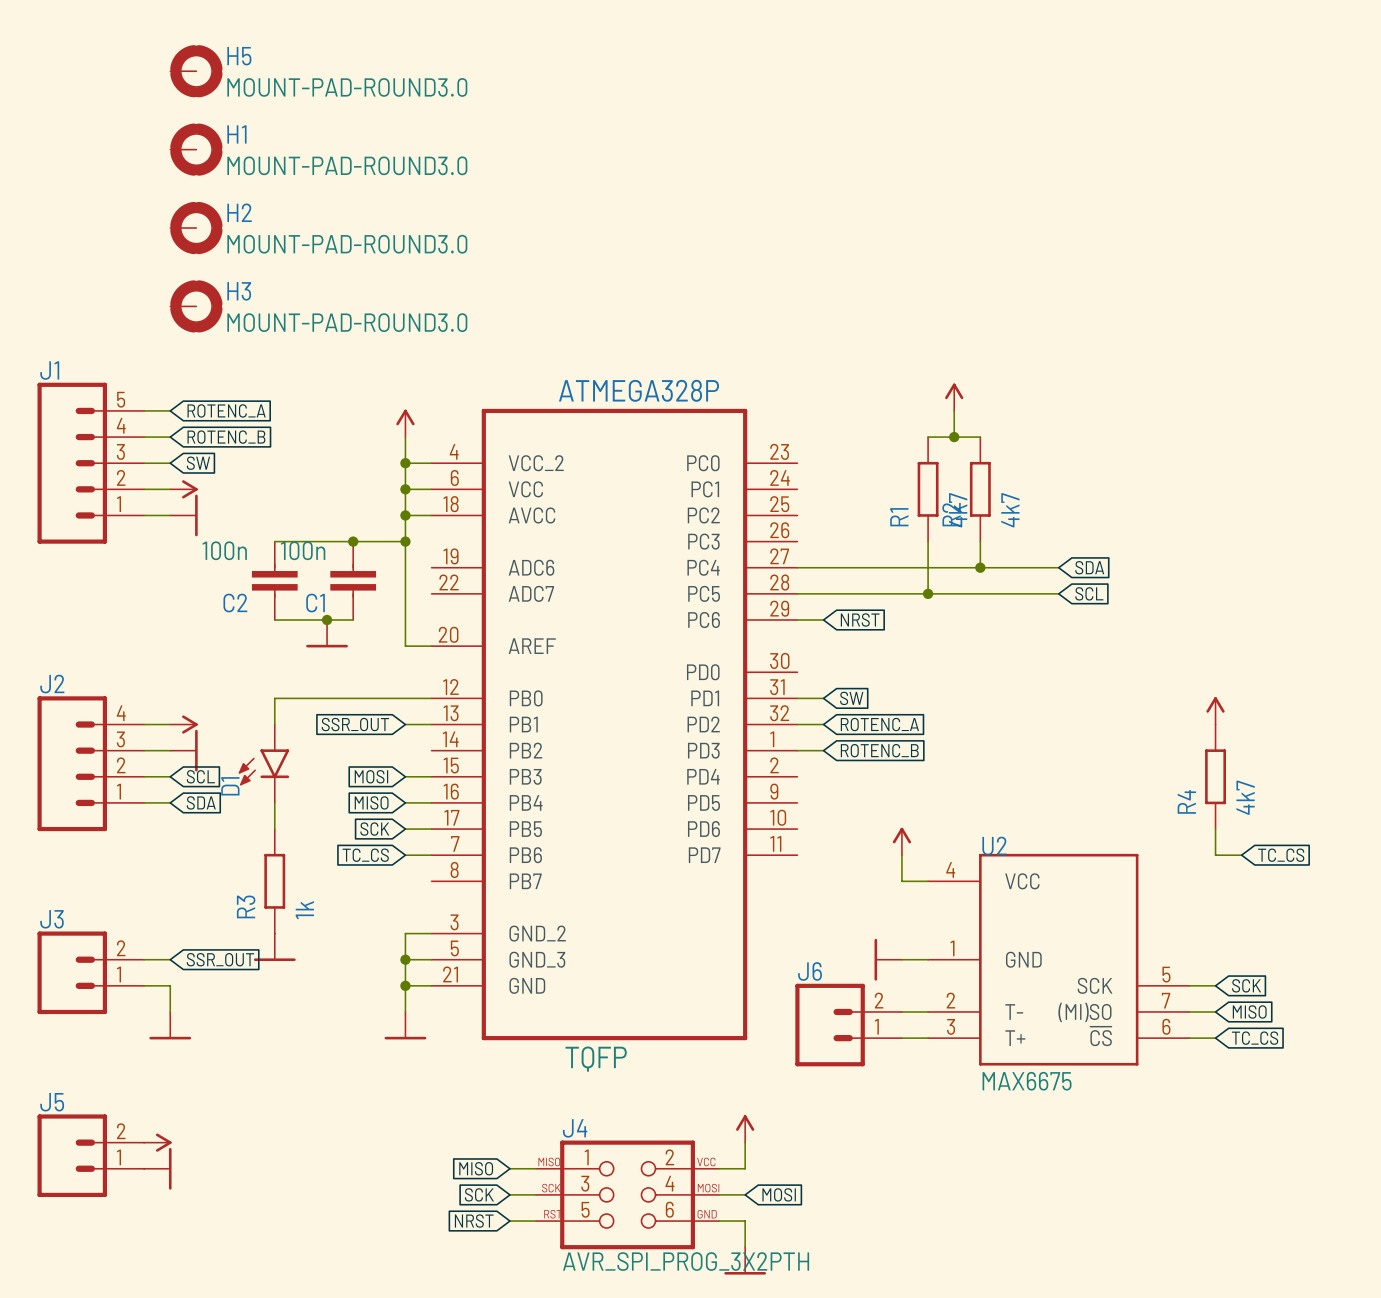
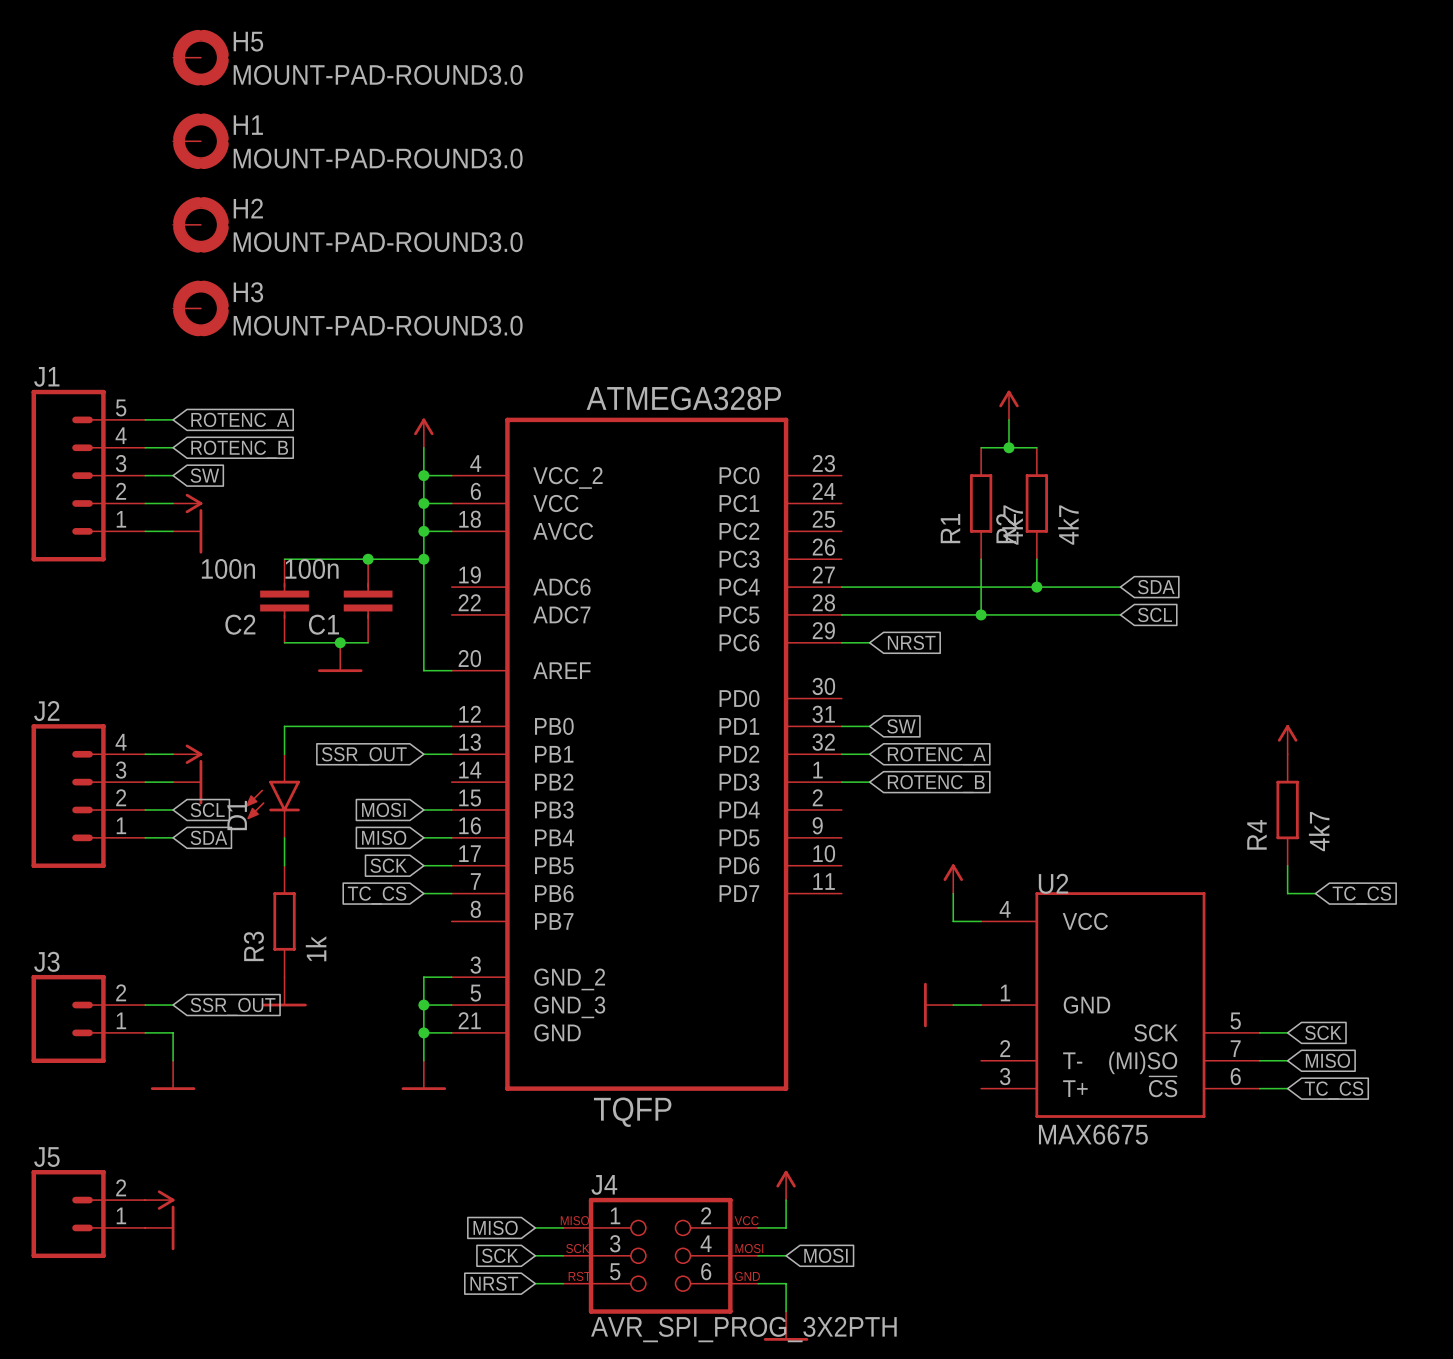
wire: (901, 1011) (928, 1011) -> none
J6: (848, 1025) -> none
wire: (901, 1038) (928, 1038) -> none

